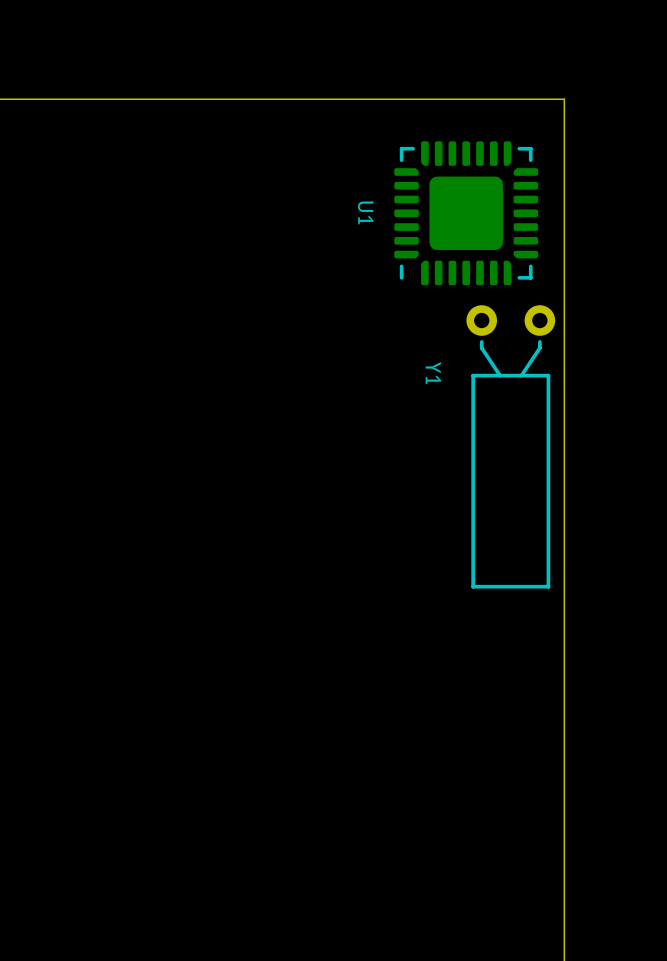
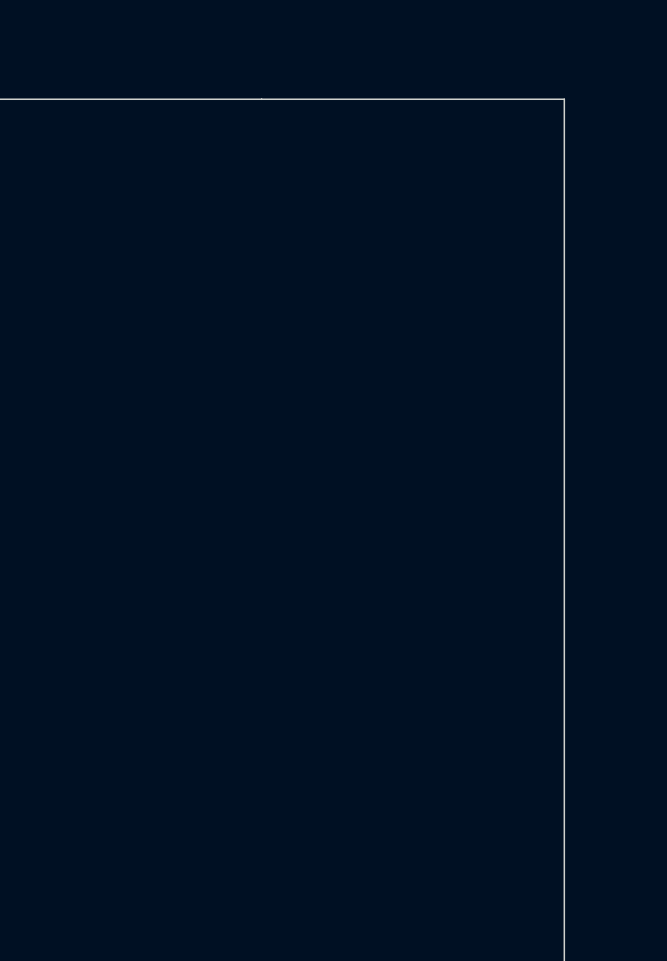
U1: (466, 213) -> none
Y1: (510, 446) -> none

